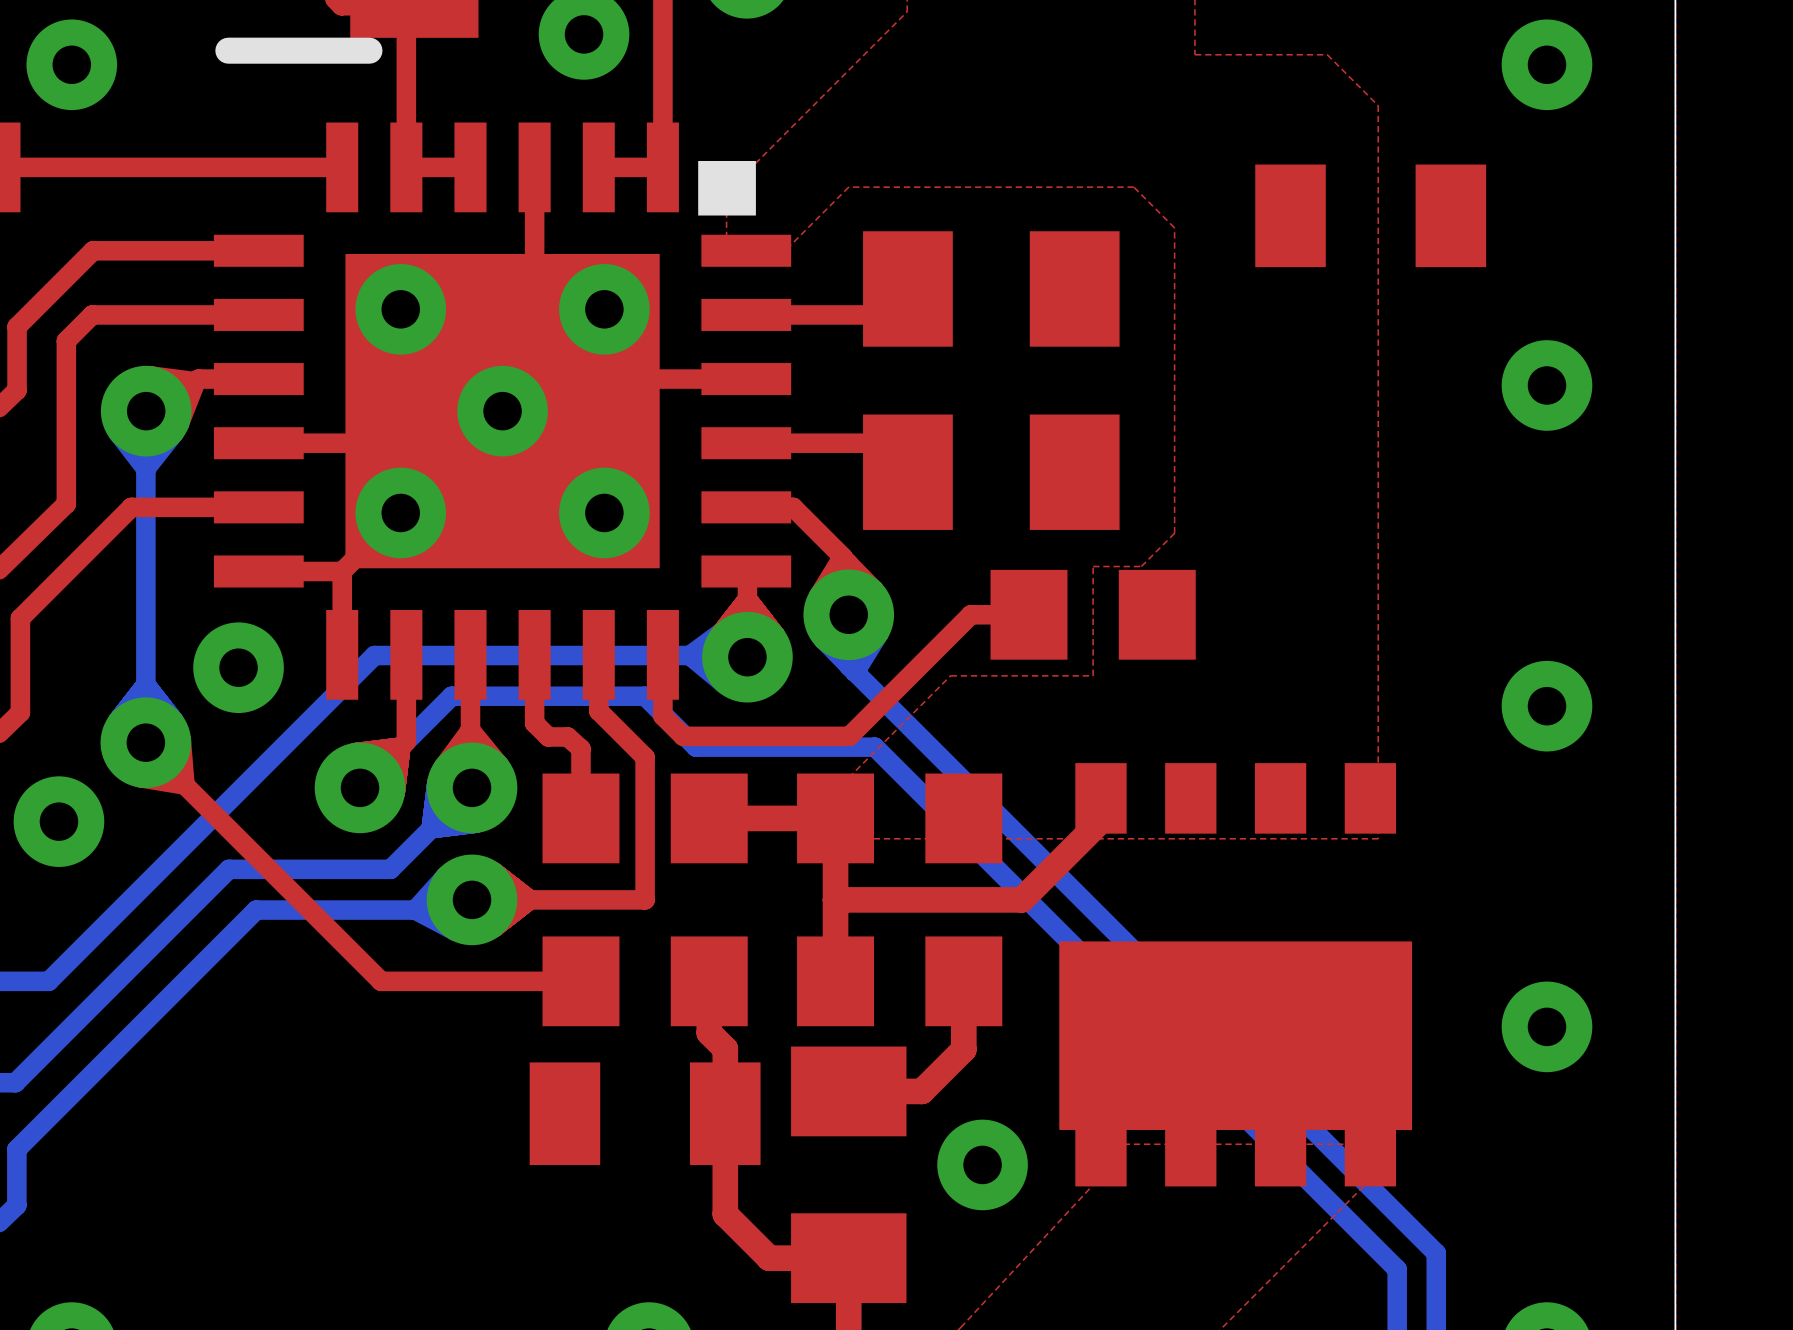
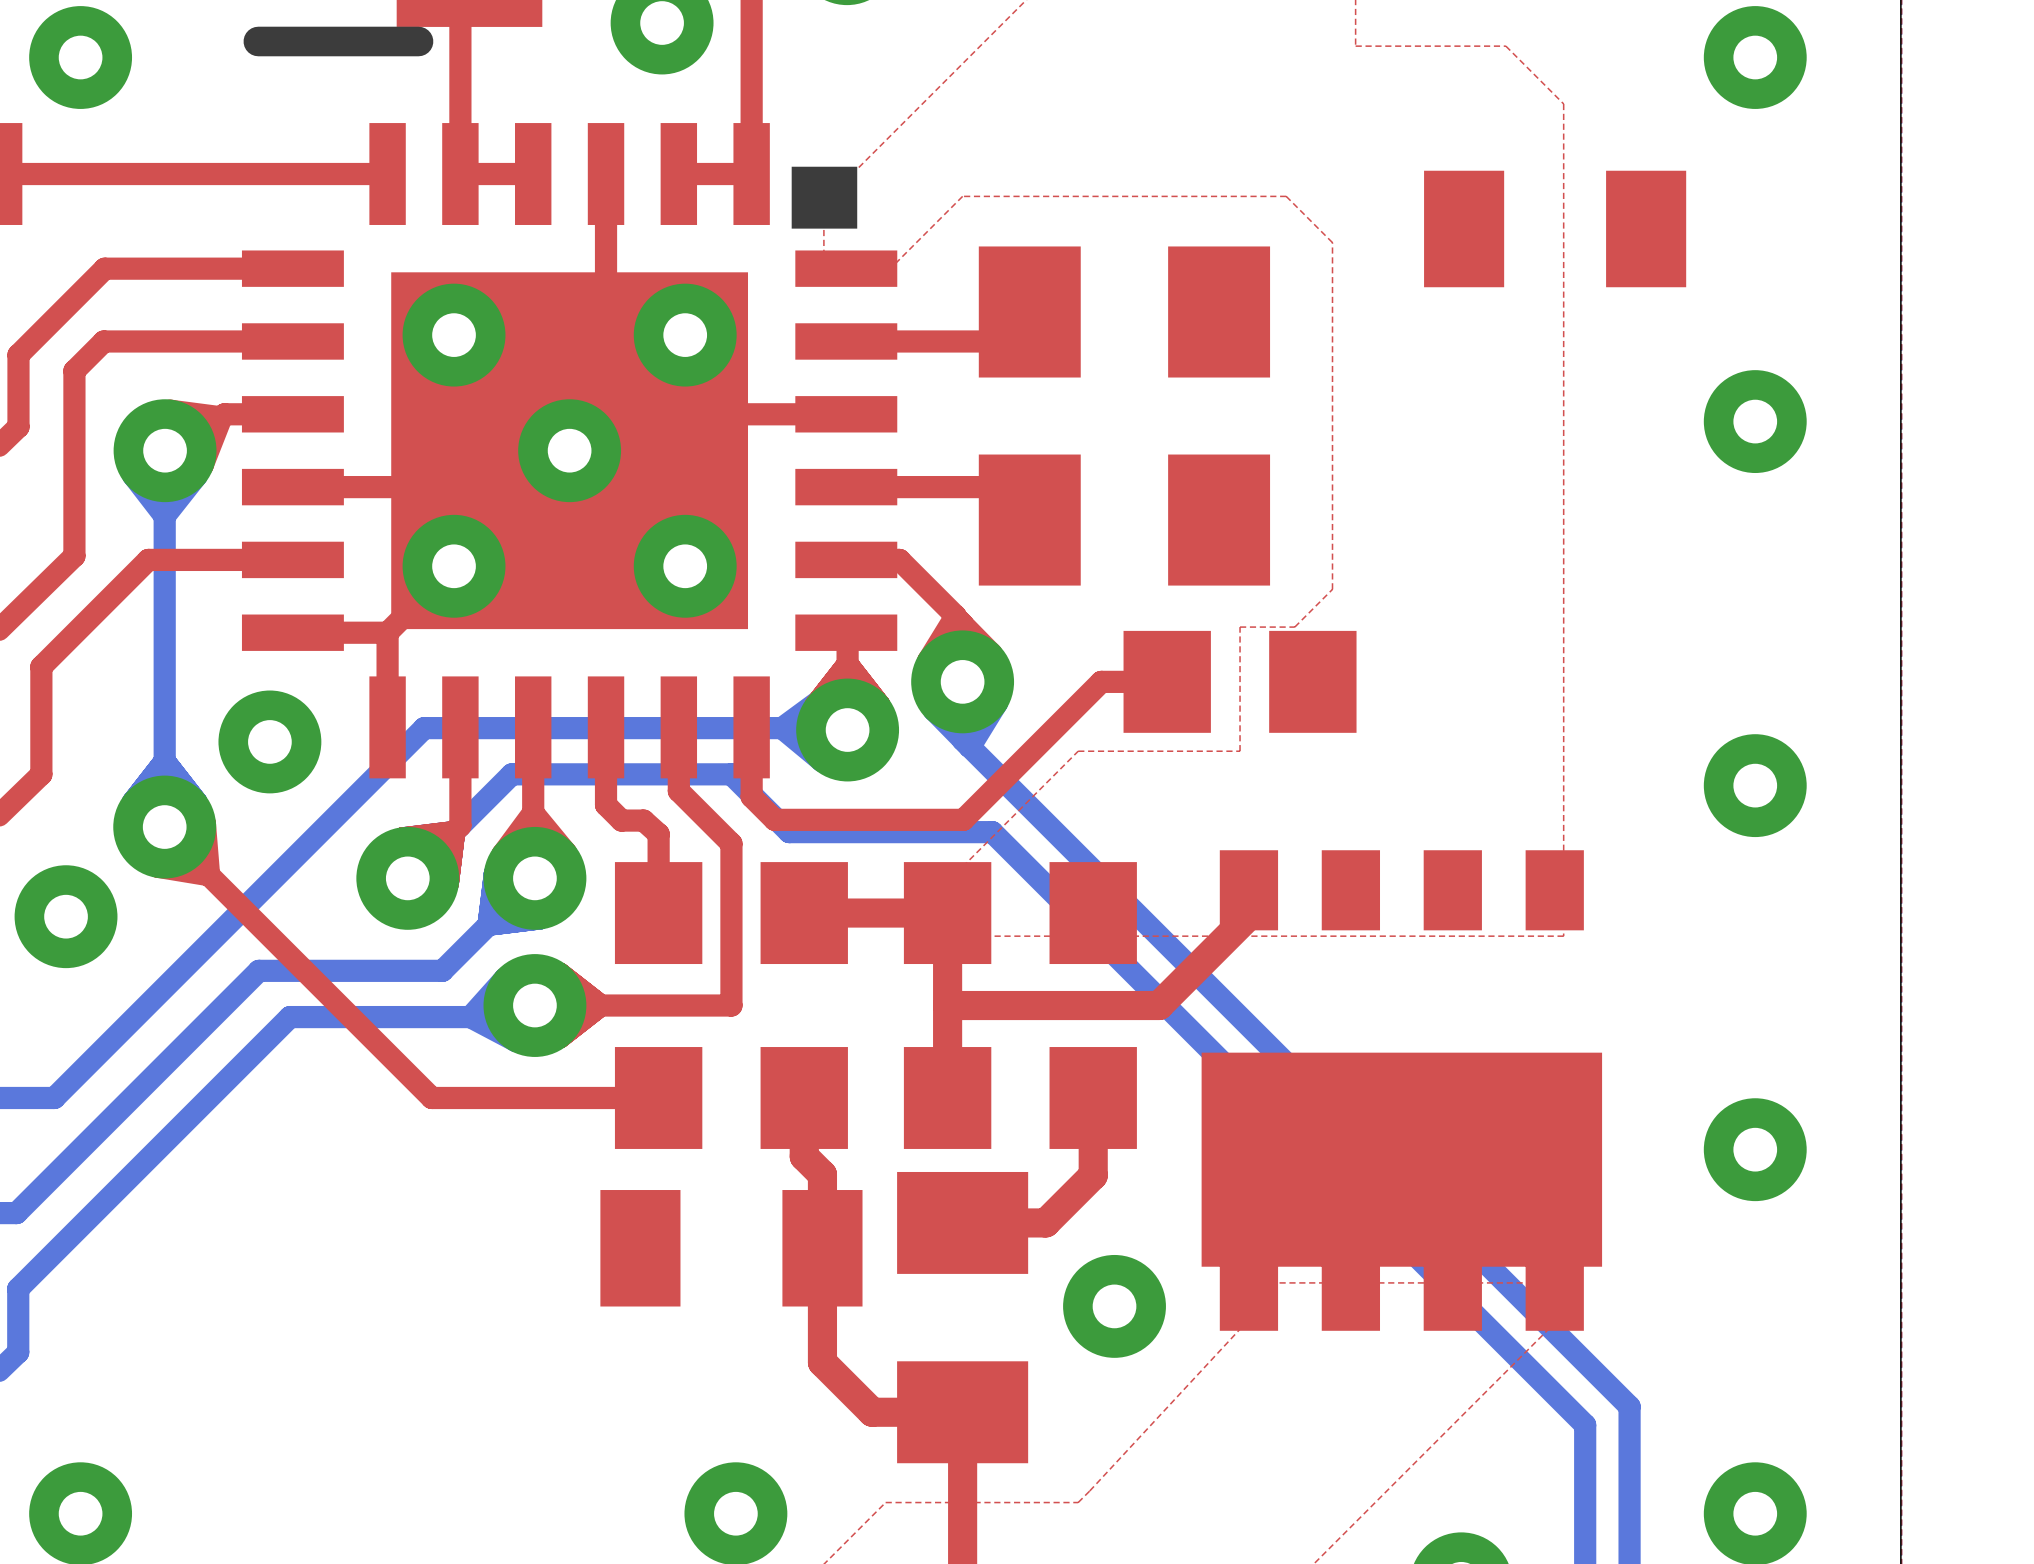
top track: (37, 601) (20, 618) (20, 712) -> (41, 666) (41, 774) (22, 792)

